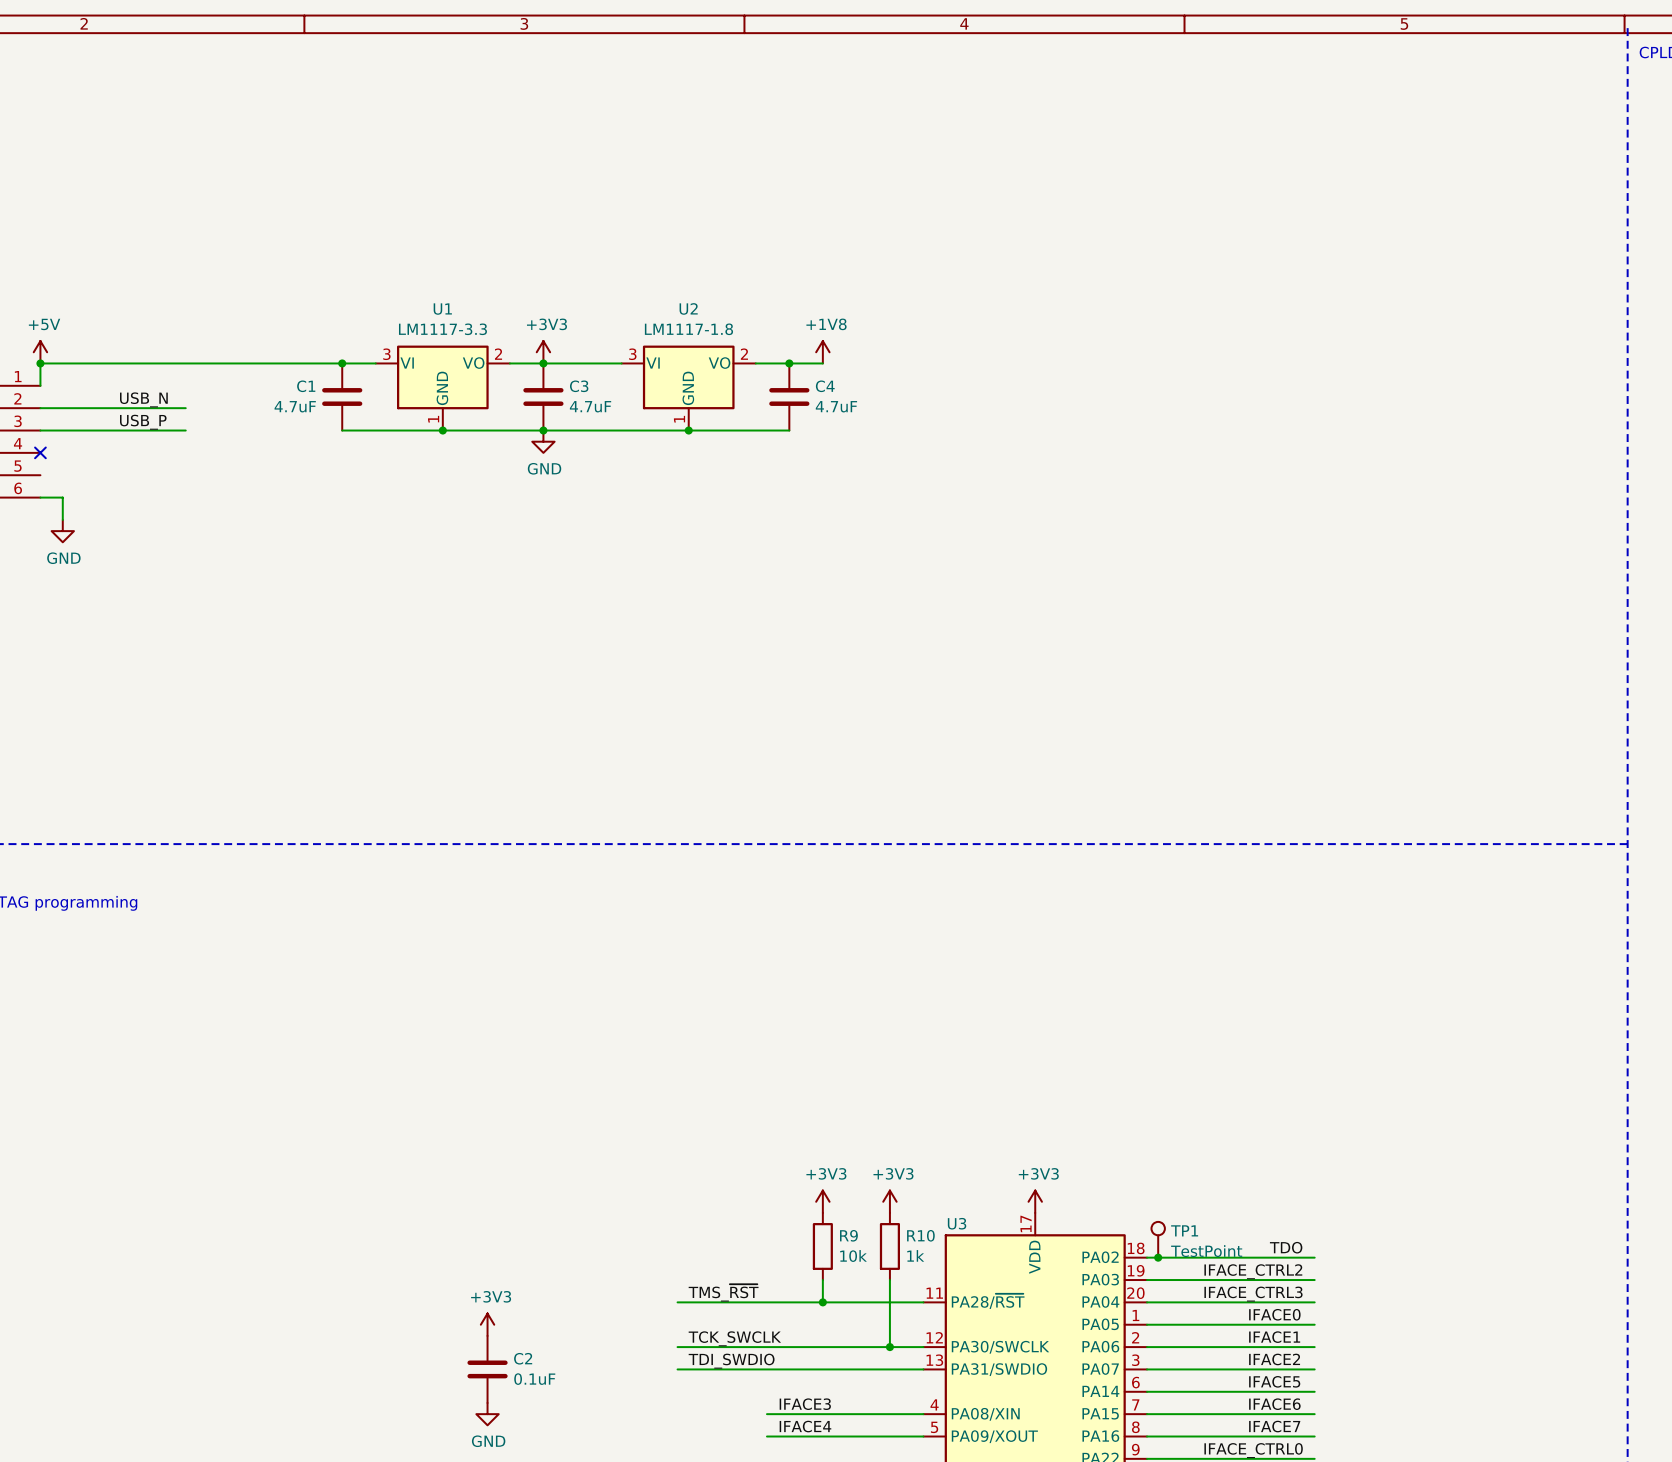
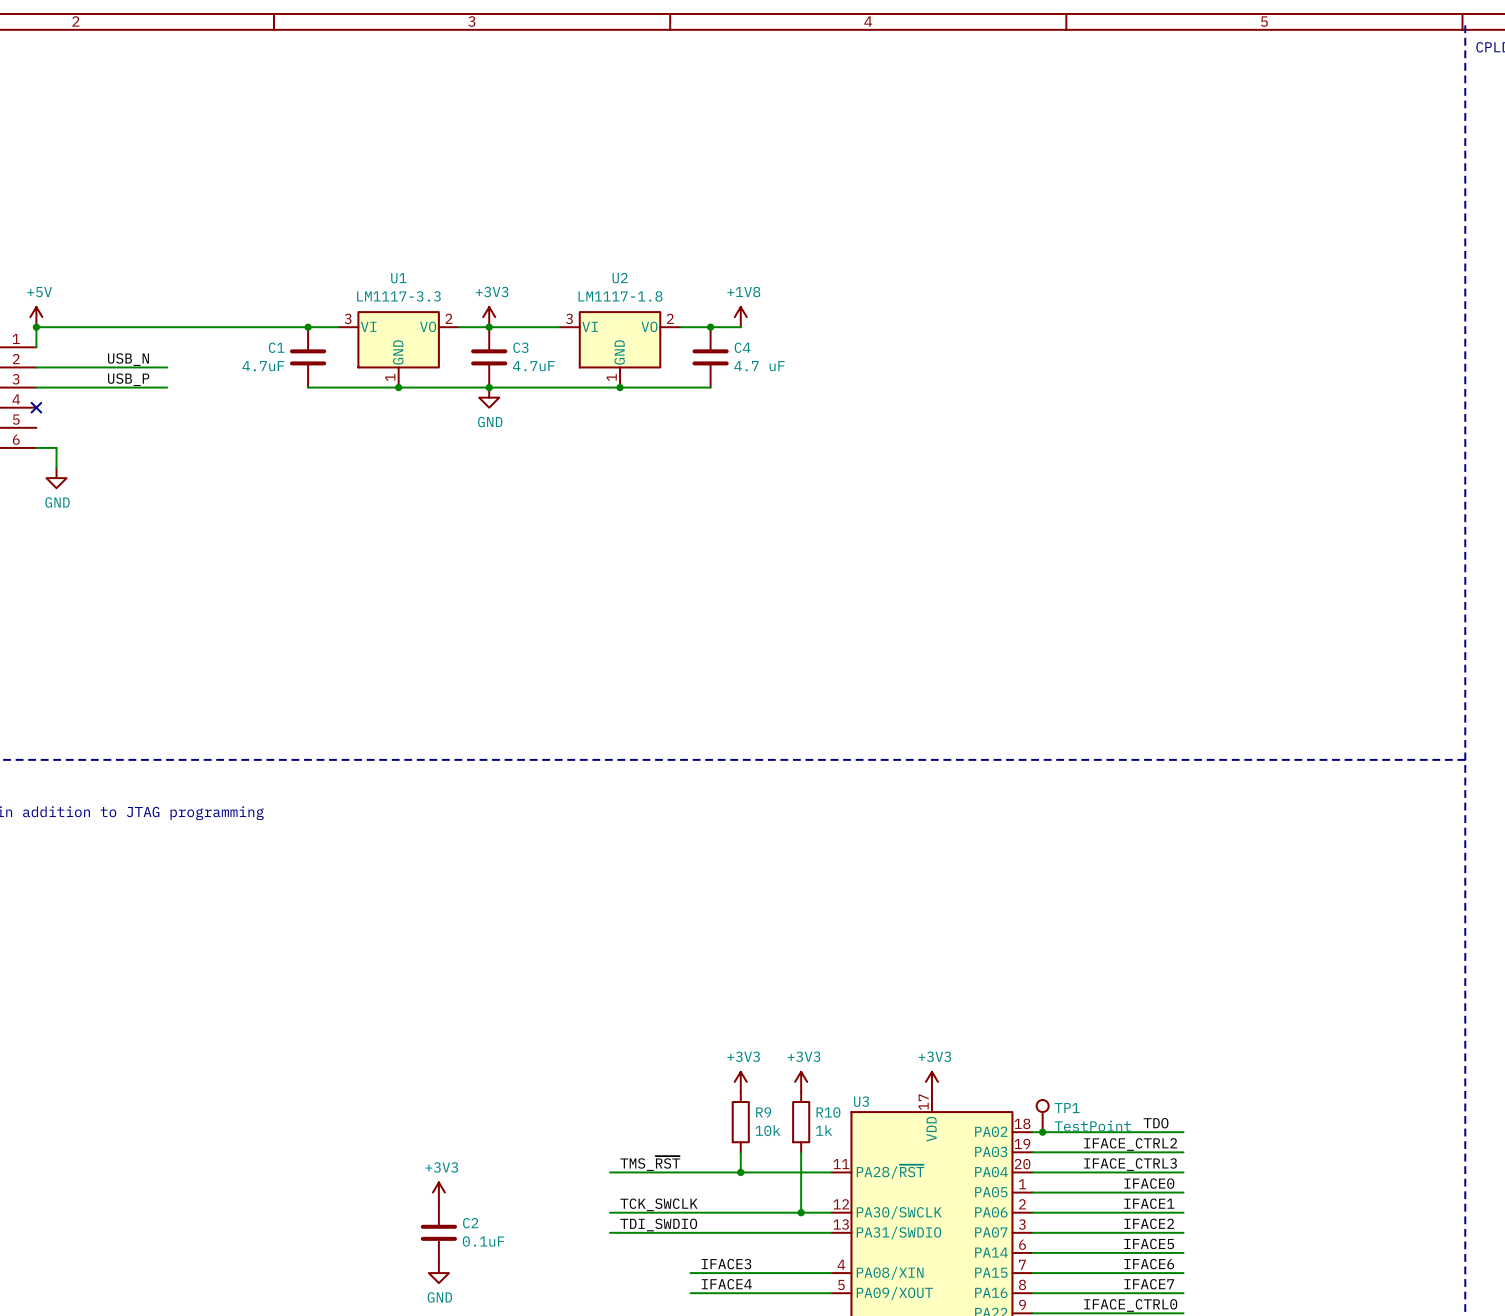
C4 value: 4.7uF (836, 406) -> 4.7 uF (759, 366)

